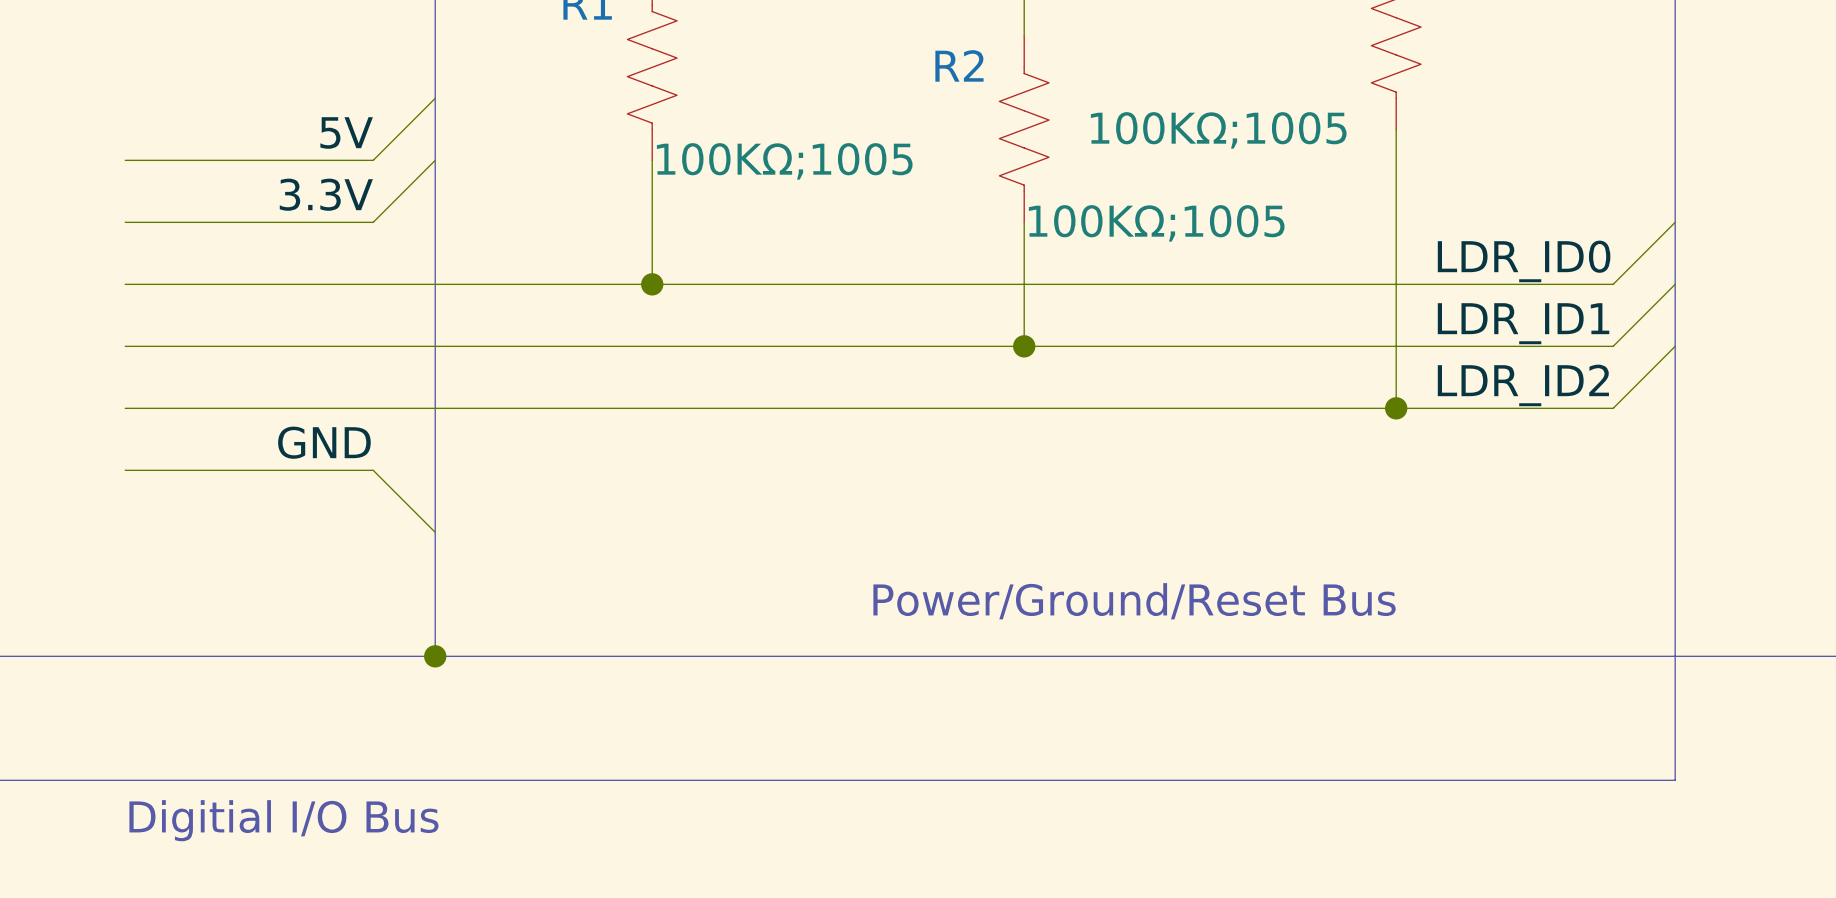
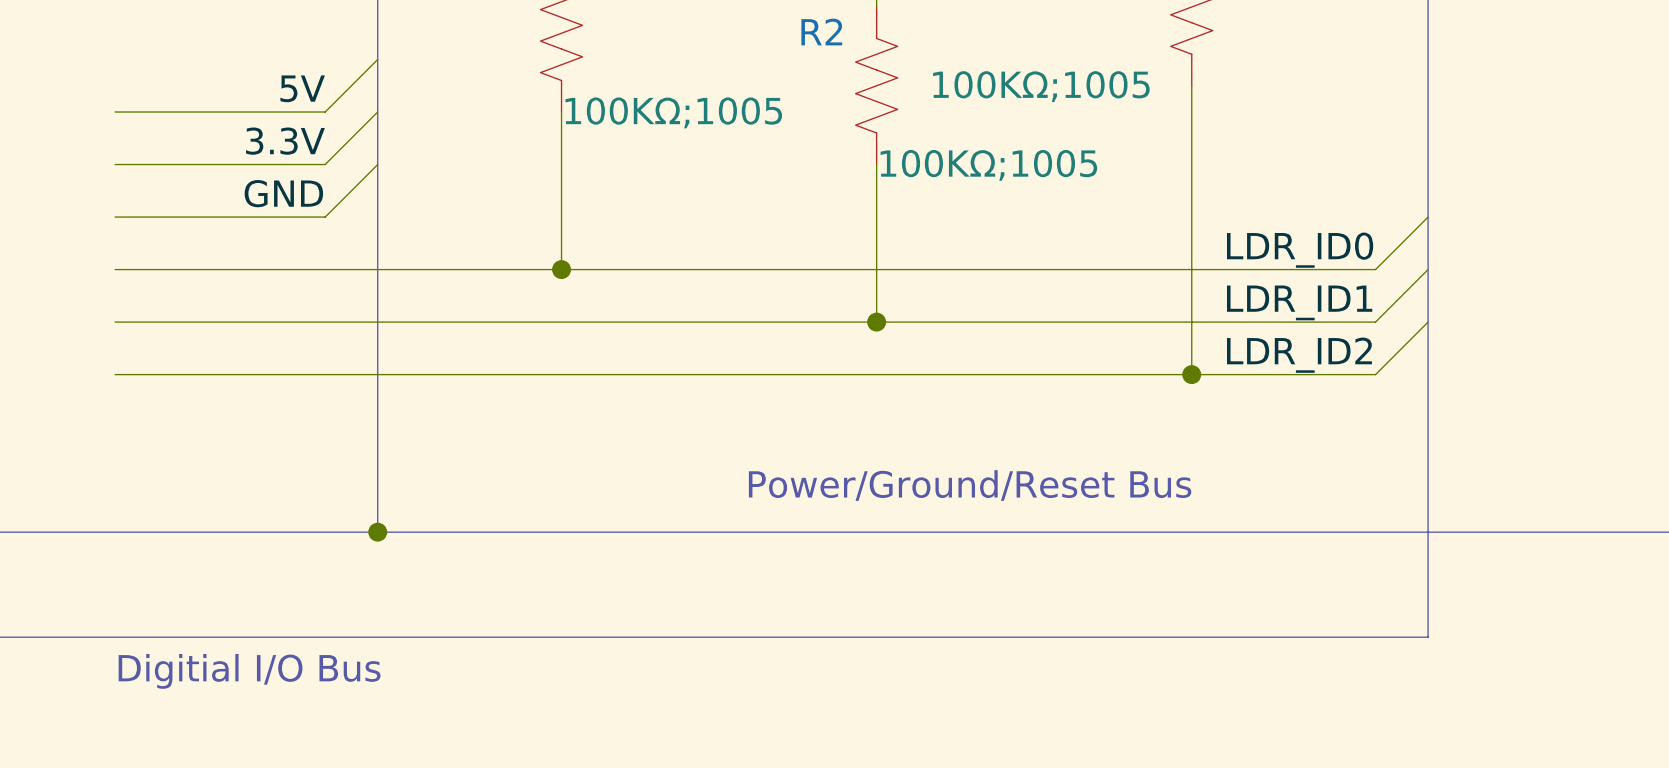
wire: (1675, 222) (1613, 284) (373, 284) -> (377, 164) (325, 217)
label: LDR_ID0 (1524, 261) -> none
wire: none -> (561, 217) (561, 269)
junction position: (652, 284) -> (561, 269)
label: LDR_ID1 (1523, 323) -> LDR_ID0 (1300, 250)
wire: none -> (876, 269) (876, 322)
junction position: (1024, 346) -> (876, 322)
label: LDR_ID2 (1523, 385) -> LDR_ID1 (1299, 302)
wire: none -> (1191, 322) (1191, 374)
junction position: (1396, 408) -> (1191, 374)
label position: GND (324, 442) -> GND (283, 193)
label: none -> LDR_ID2 (1299, 355)
wire: (373, 470) (435, 532) -> (325, 374) (1375, 374) (1428, 322)

